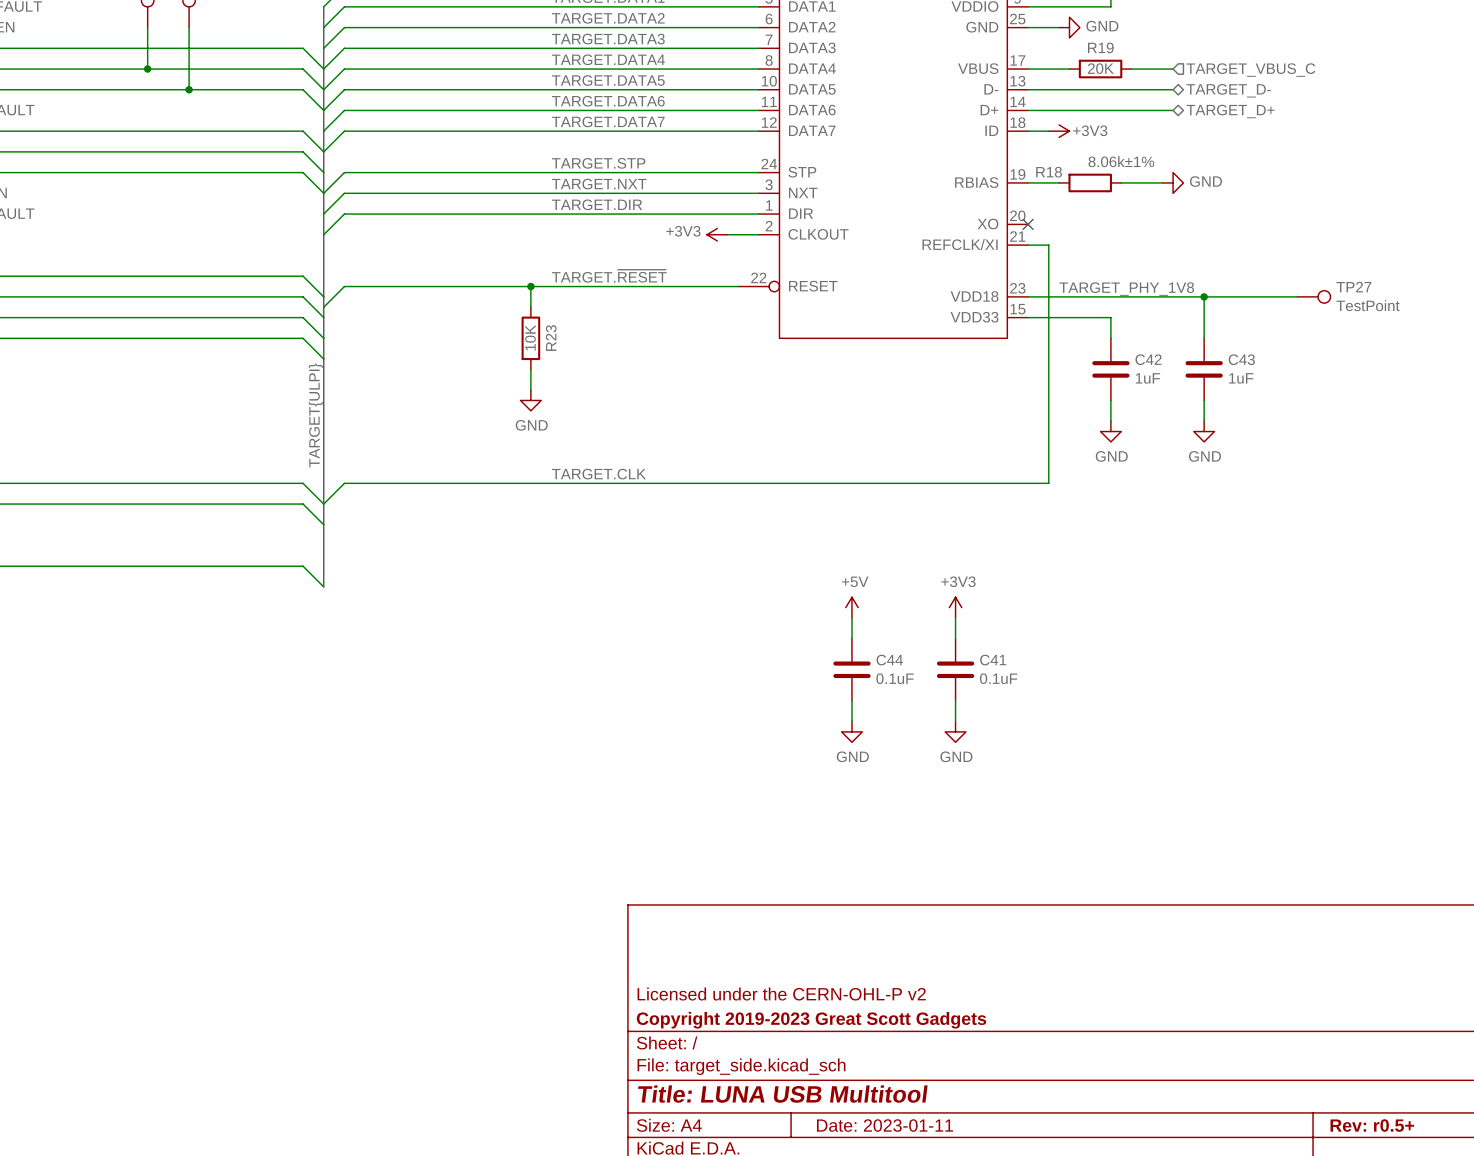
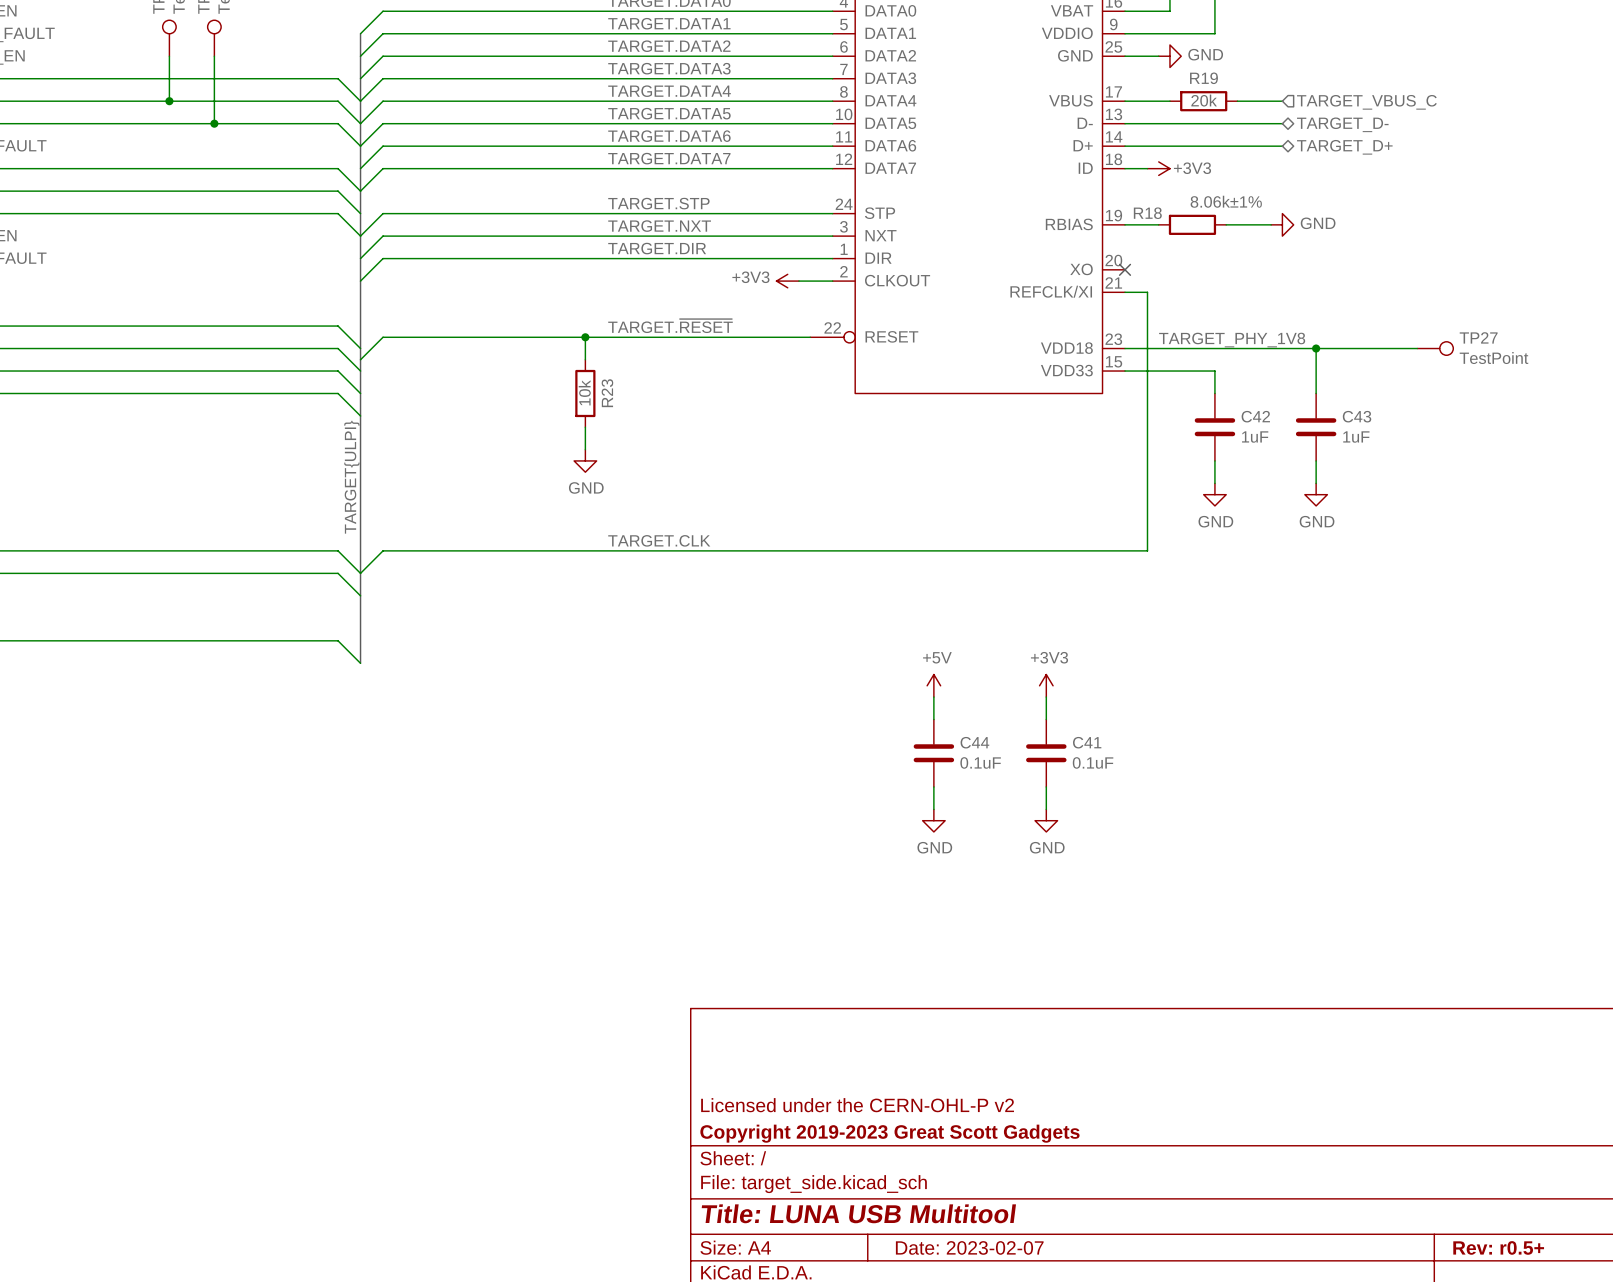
R19 value: 20K (1100, 68) -> 20k (1204, 100)
R23 value: 10K (530, 337) -> 10k (584, 392)
title block: Date: 2023-01-11 (885, 1125) -> Date: 2023-02-07 (969, 1247)

